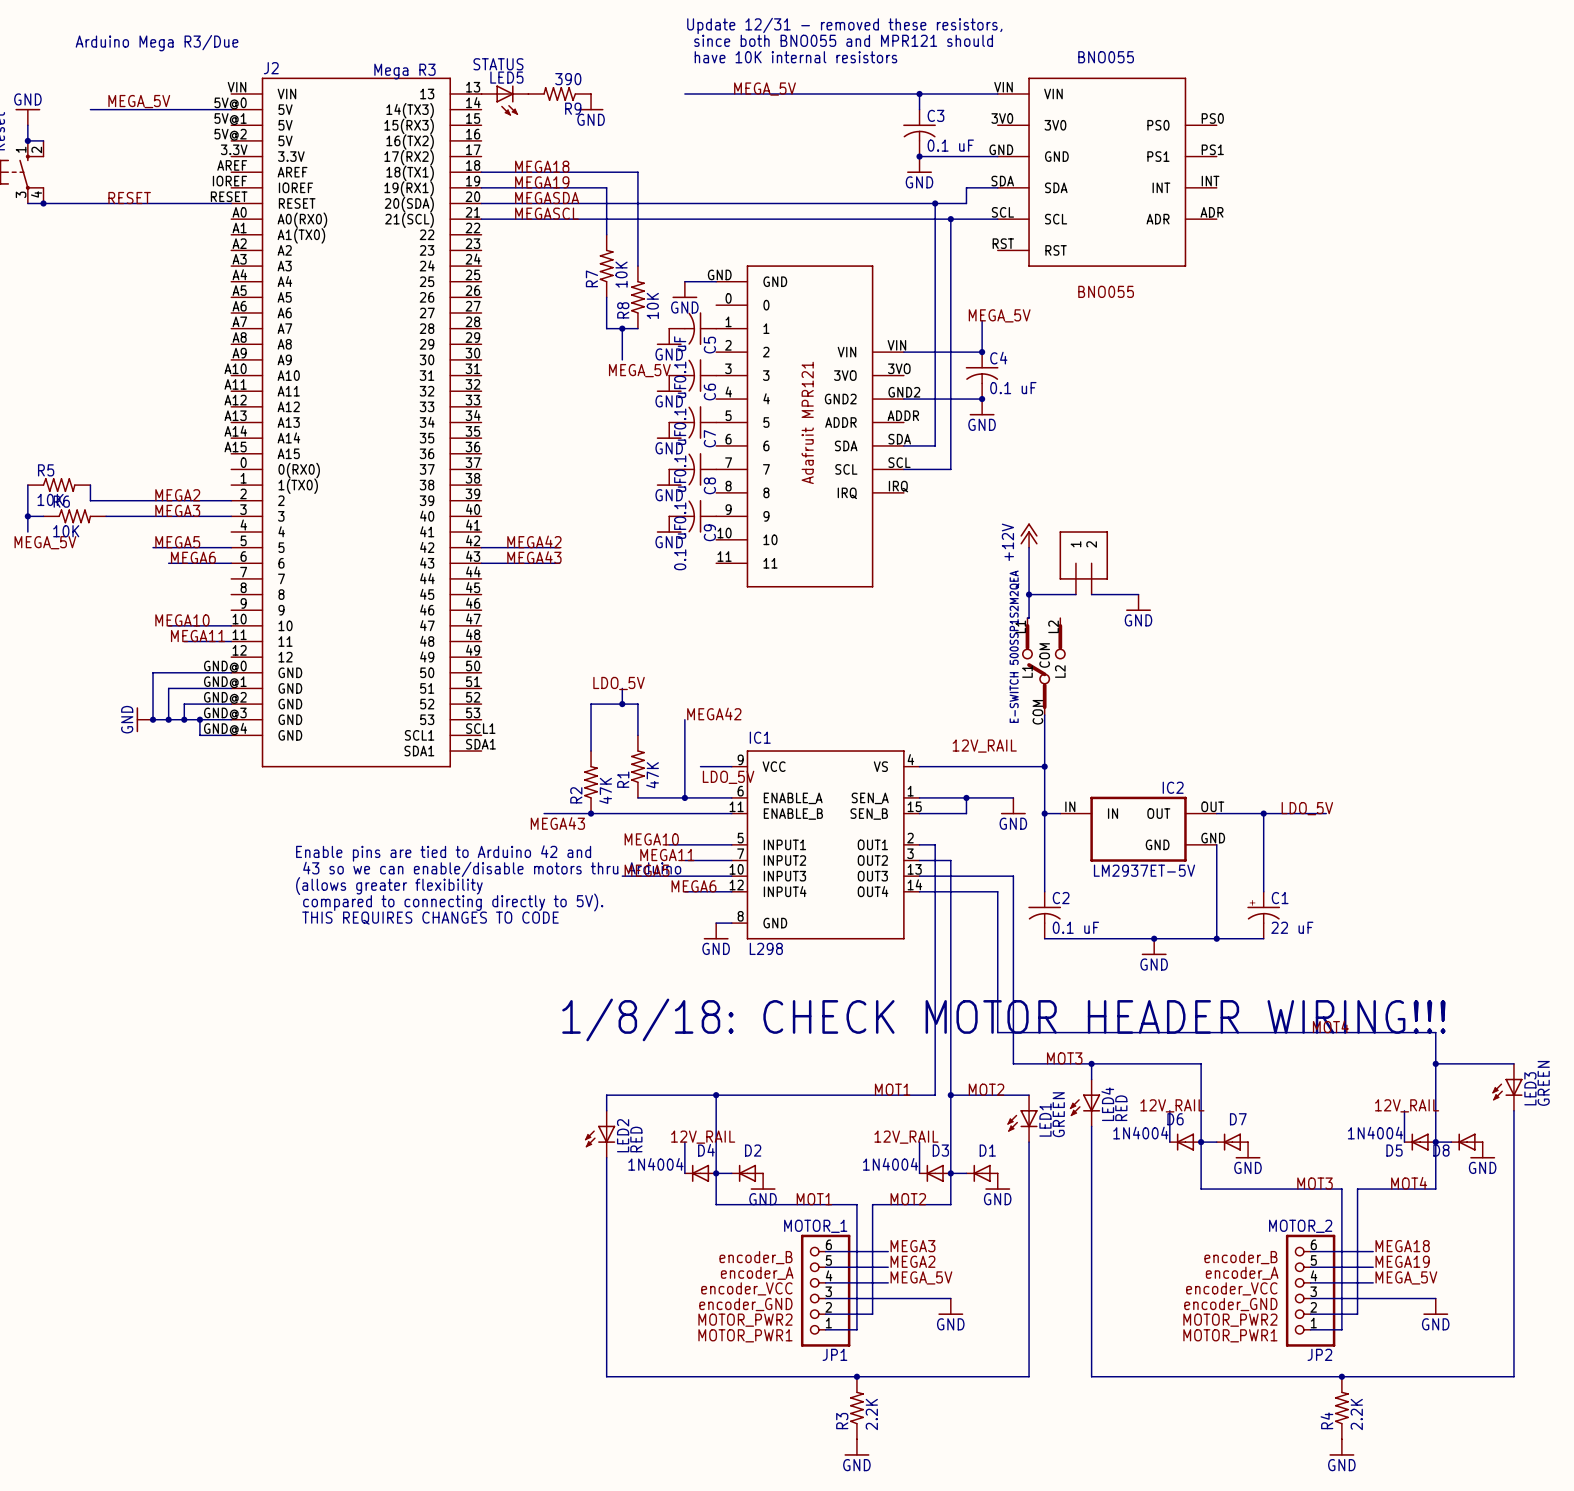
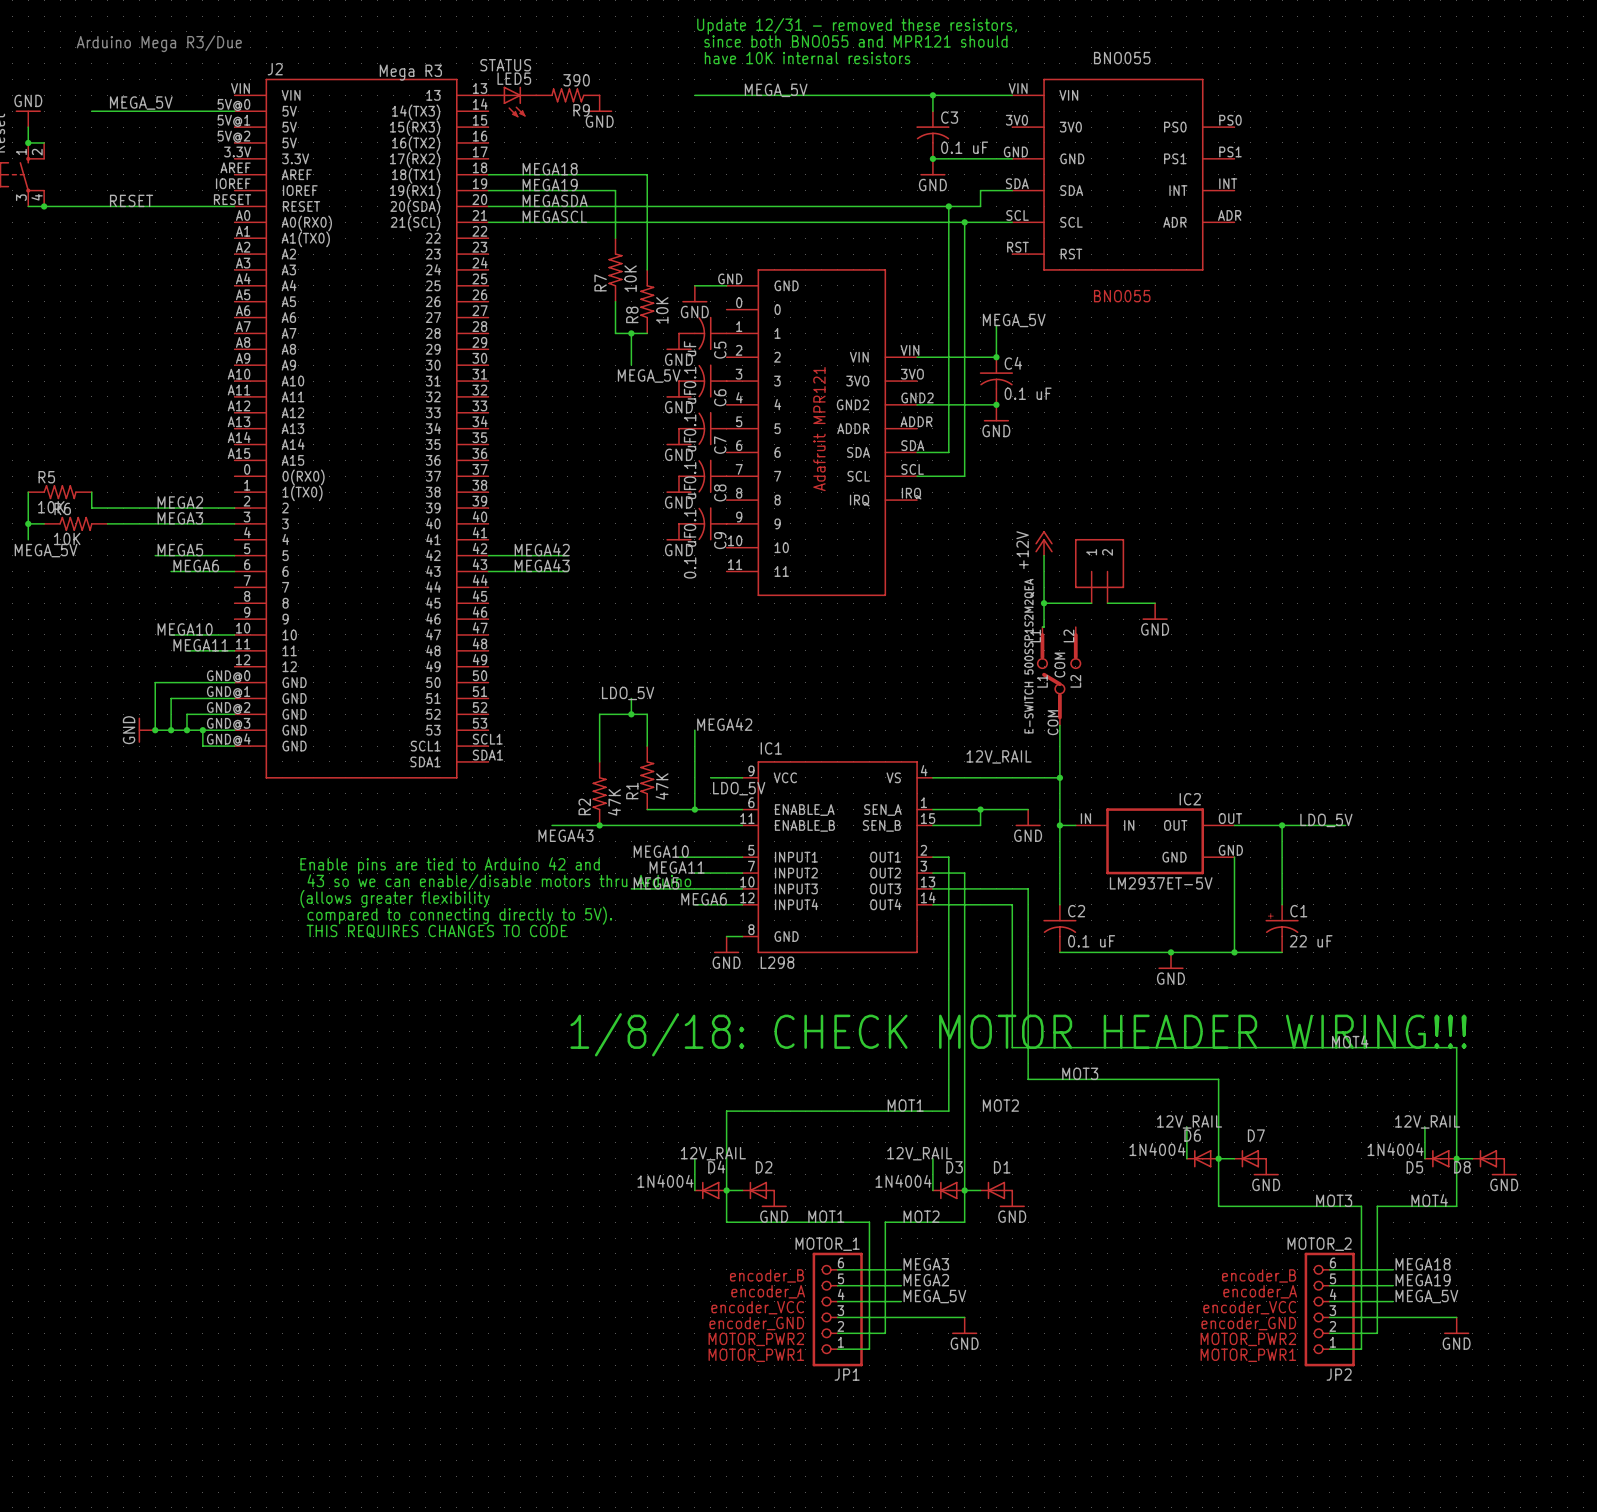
wire: (1091, 1063) (1091, 1079) -> none
junction: (1091, 1063) -> none
wire: (1435, 1063) (1513, 1063) -> none
junction: (1435, 1063) -> none
LED3: GREEN (1507, 1087) -> none
wire: (716, 1095) (606, 1095) (606, 1110) -> none
junction: (716, 1095) -> none
wire: (950, 1095) (1029, 1095) -> none
junction: (950, 1095) -> none
LED4: RED (1085, 1102) -> none
wire: (1513, 1110) (1513, 1376) (1091, 1376) (1091, 1126) -> none
LED1: GREEN (1022, 1118) -> none
LED2: RED (600, 1134) -> none
wire: (1029, 1142) (1029, 1376) (606, 1376) (606, 1157) -> none
junction: (856, 1376) -> none
junction: (1341, 1376) -> none
R3: 2.2K (856, 1408) -> none
R4: 2.2K (1341, 1408) -> none
power symbol: GND (856, 1447) -> none
power symbol: GND (1341, 1447) -> none

